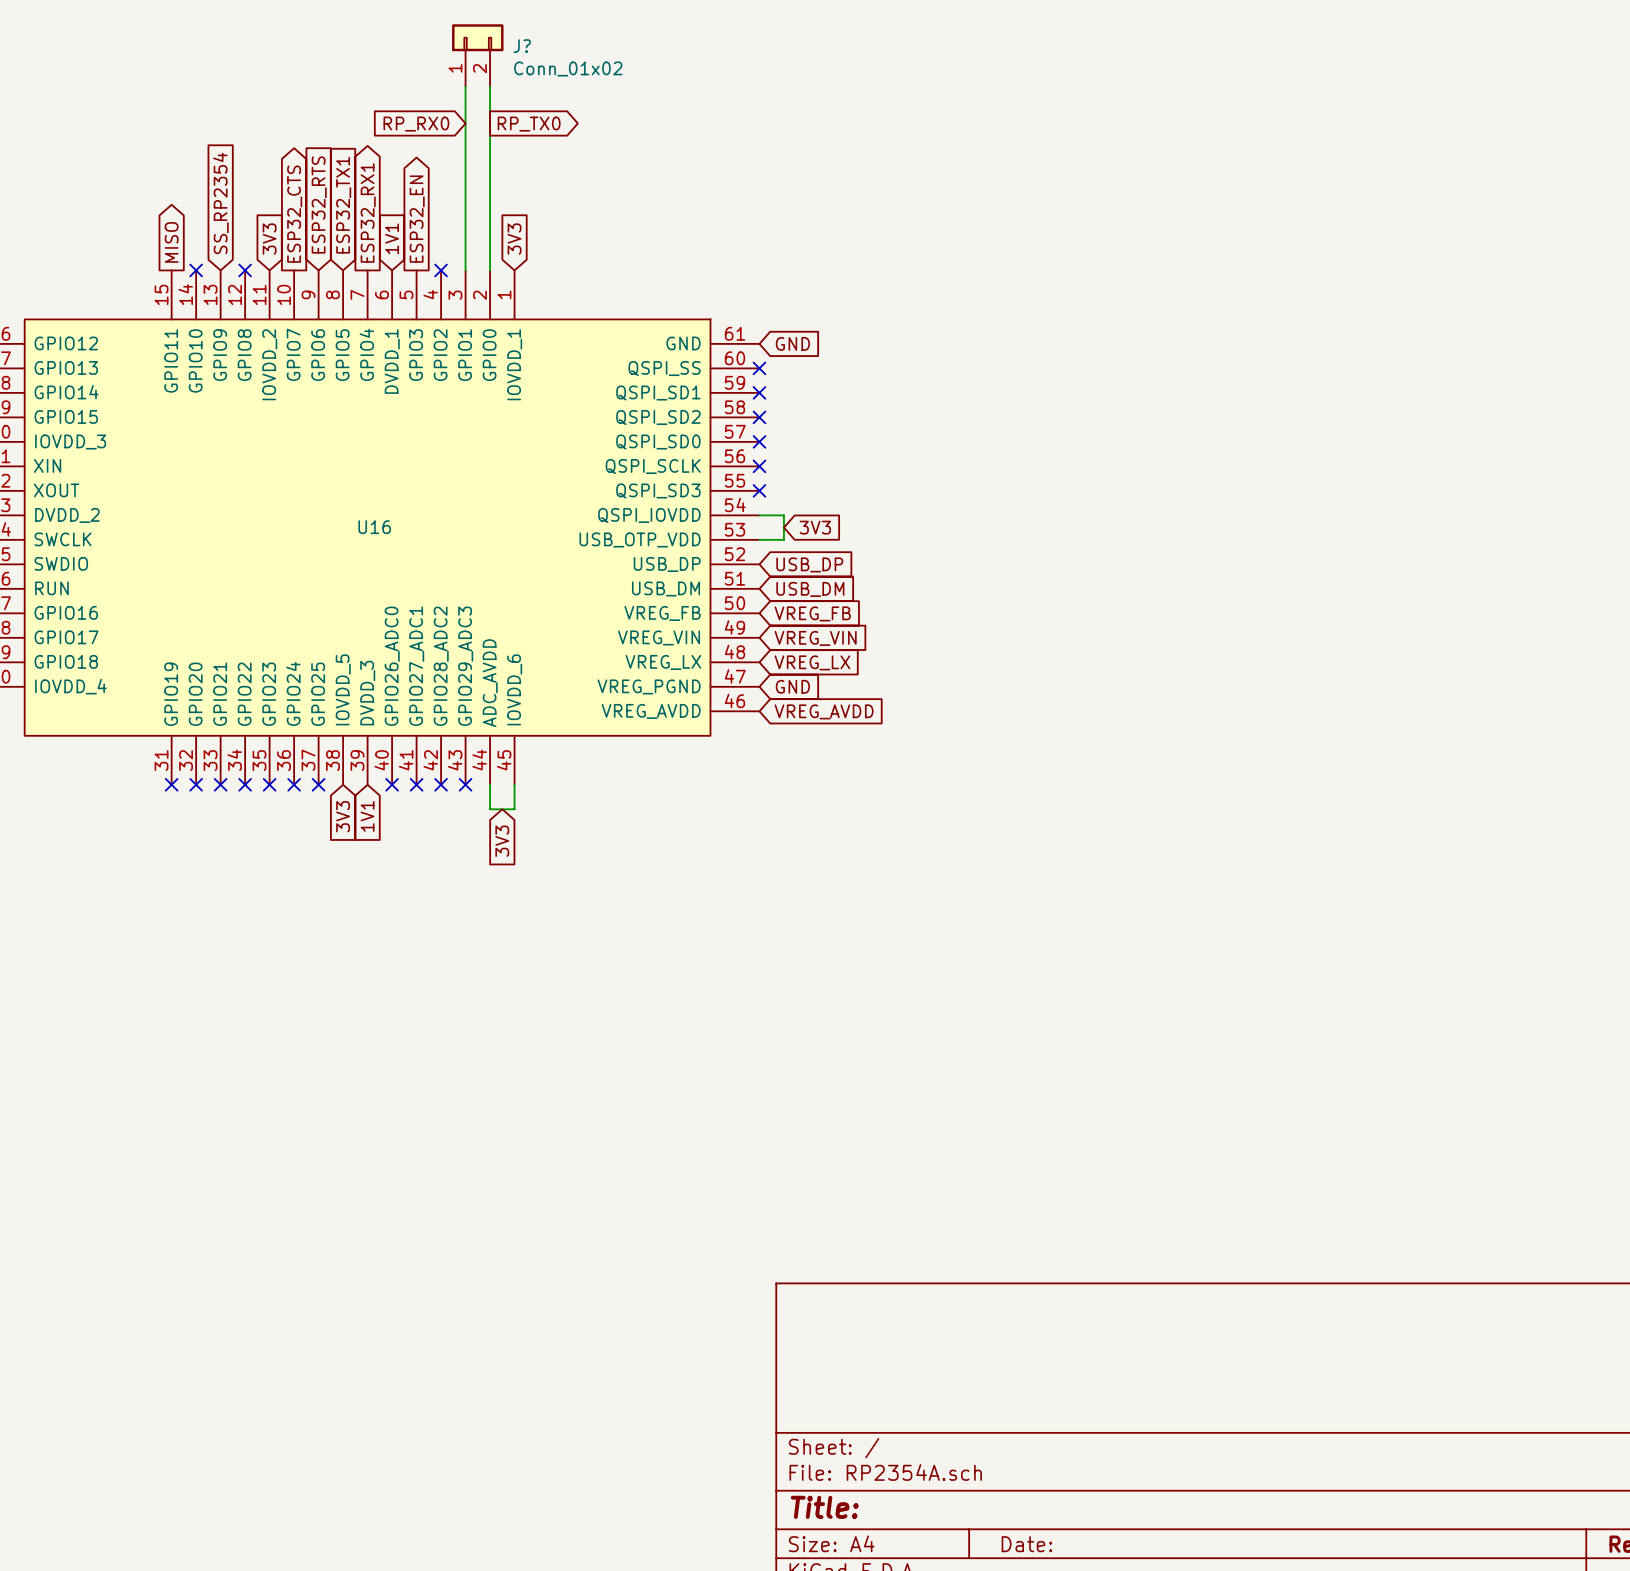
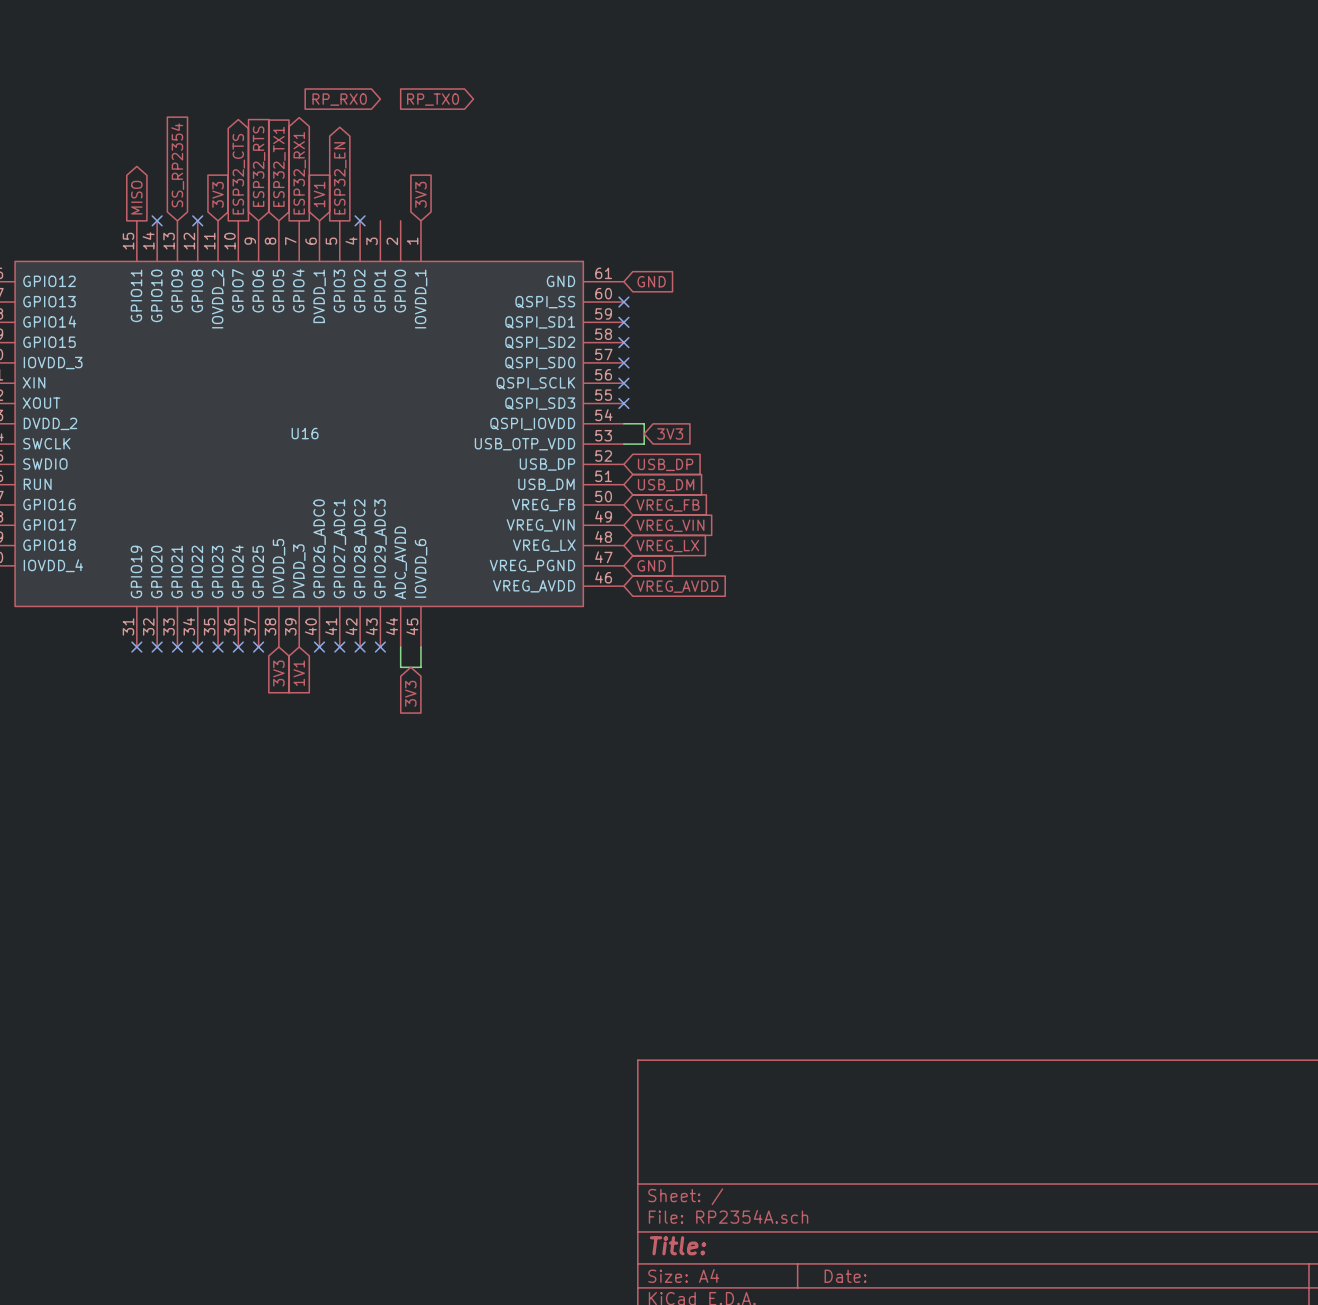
J?: Conn_01x02 (477, 55) -> none
wire: (465, 86) (465, 270) -> none
wire: (490, 86) (490, 270) -> none

